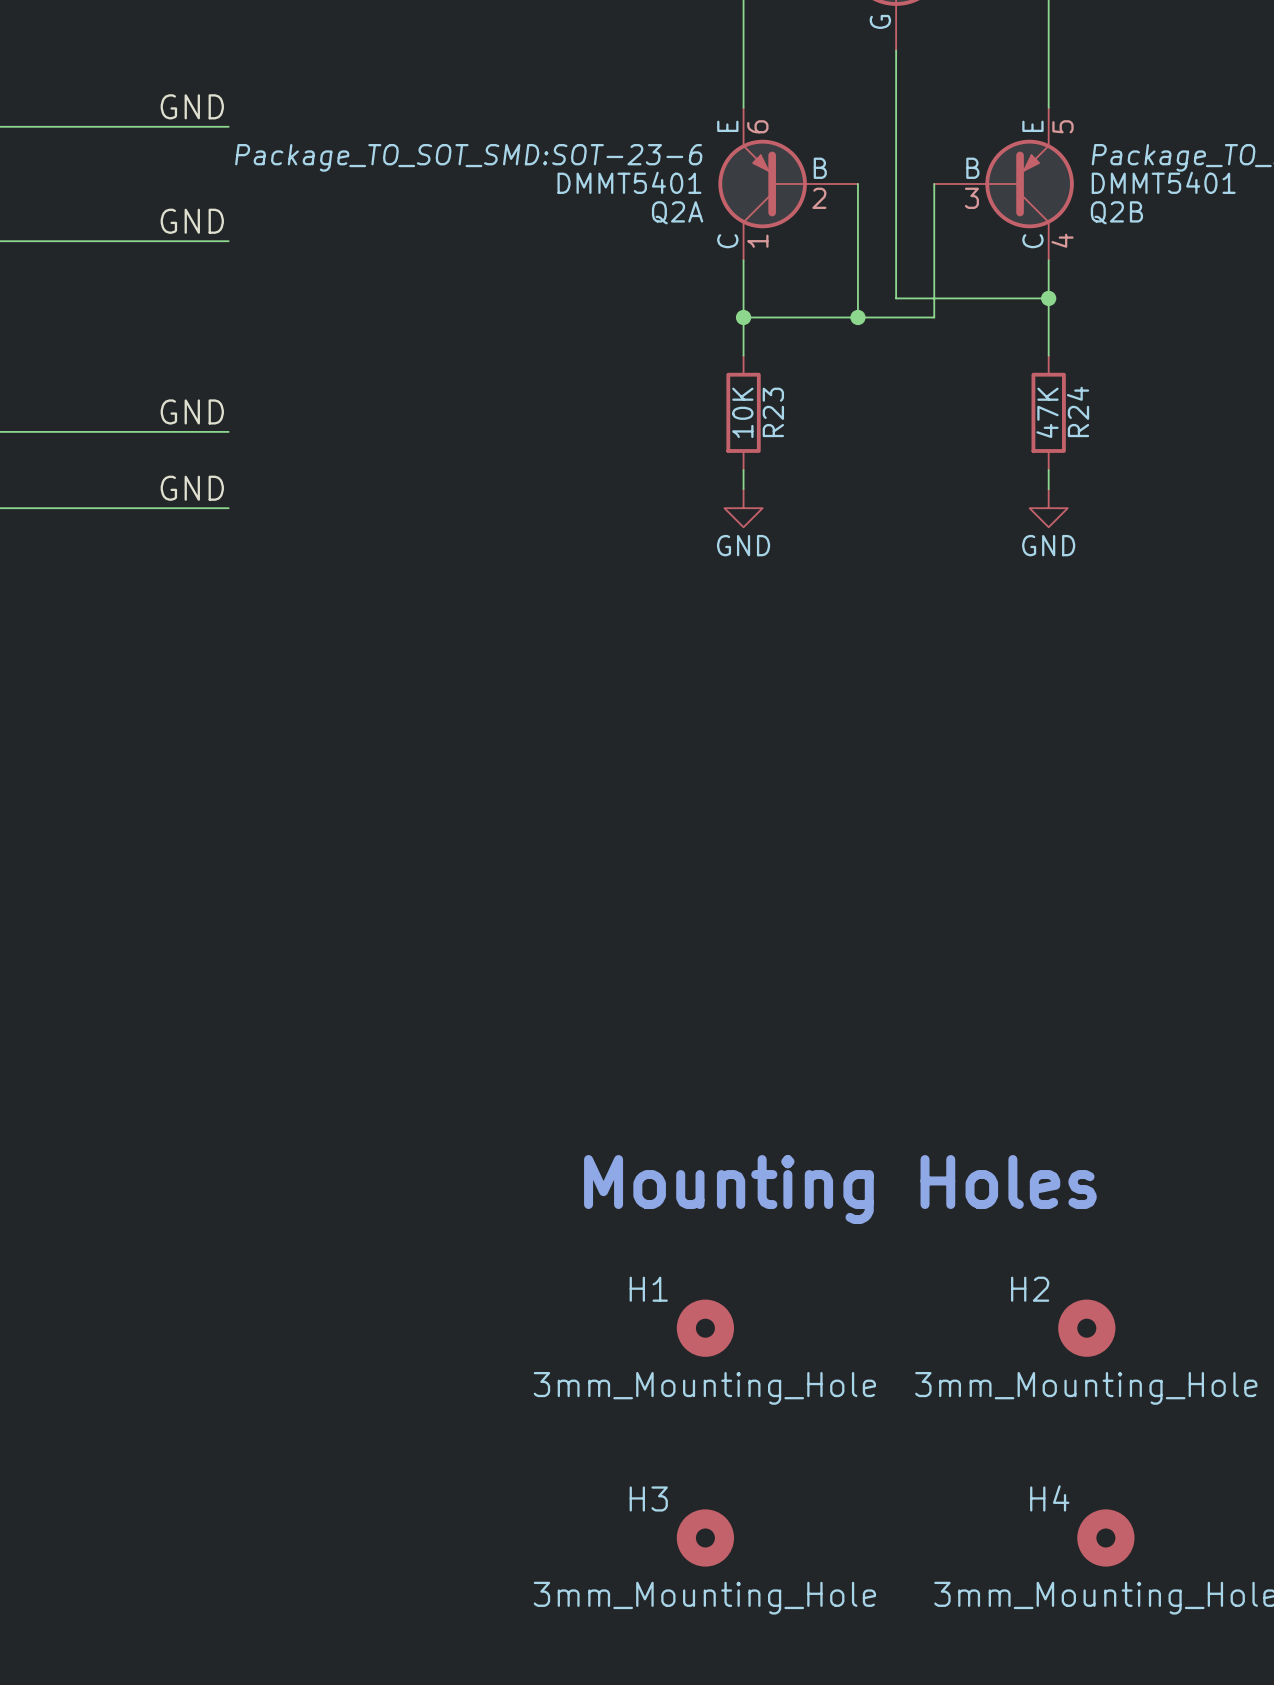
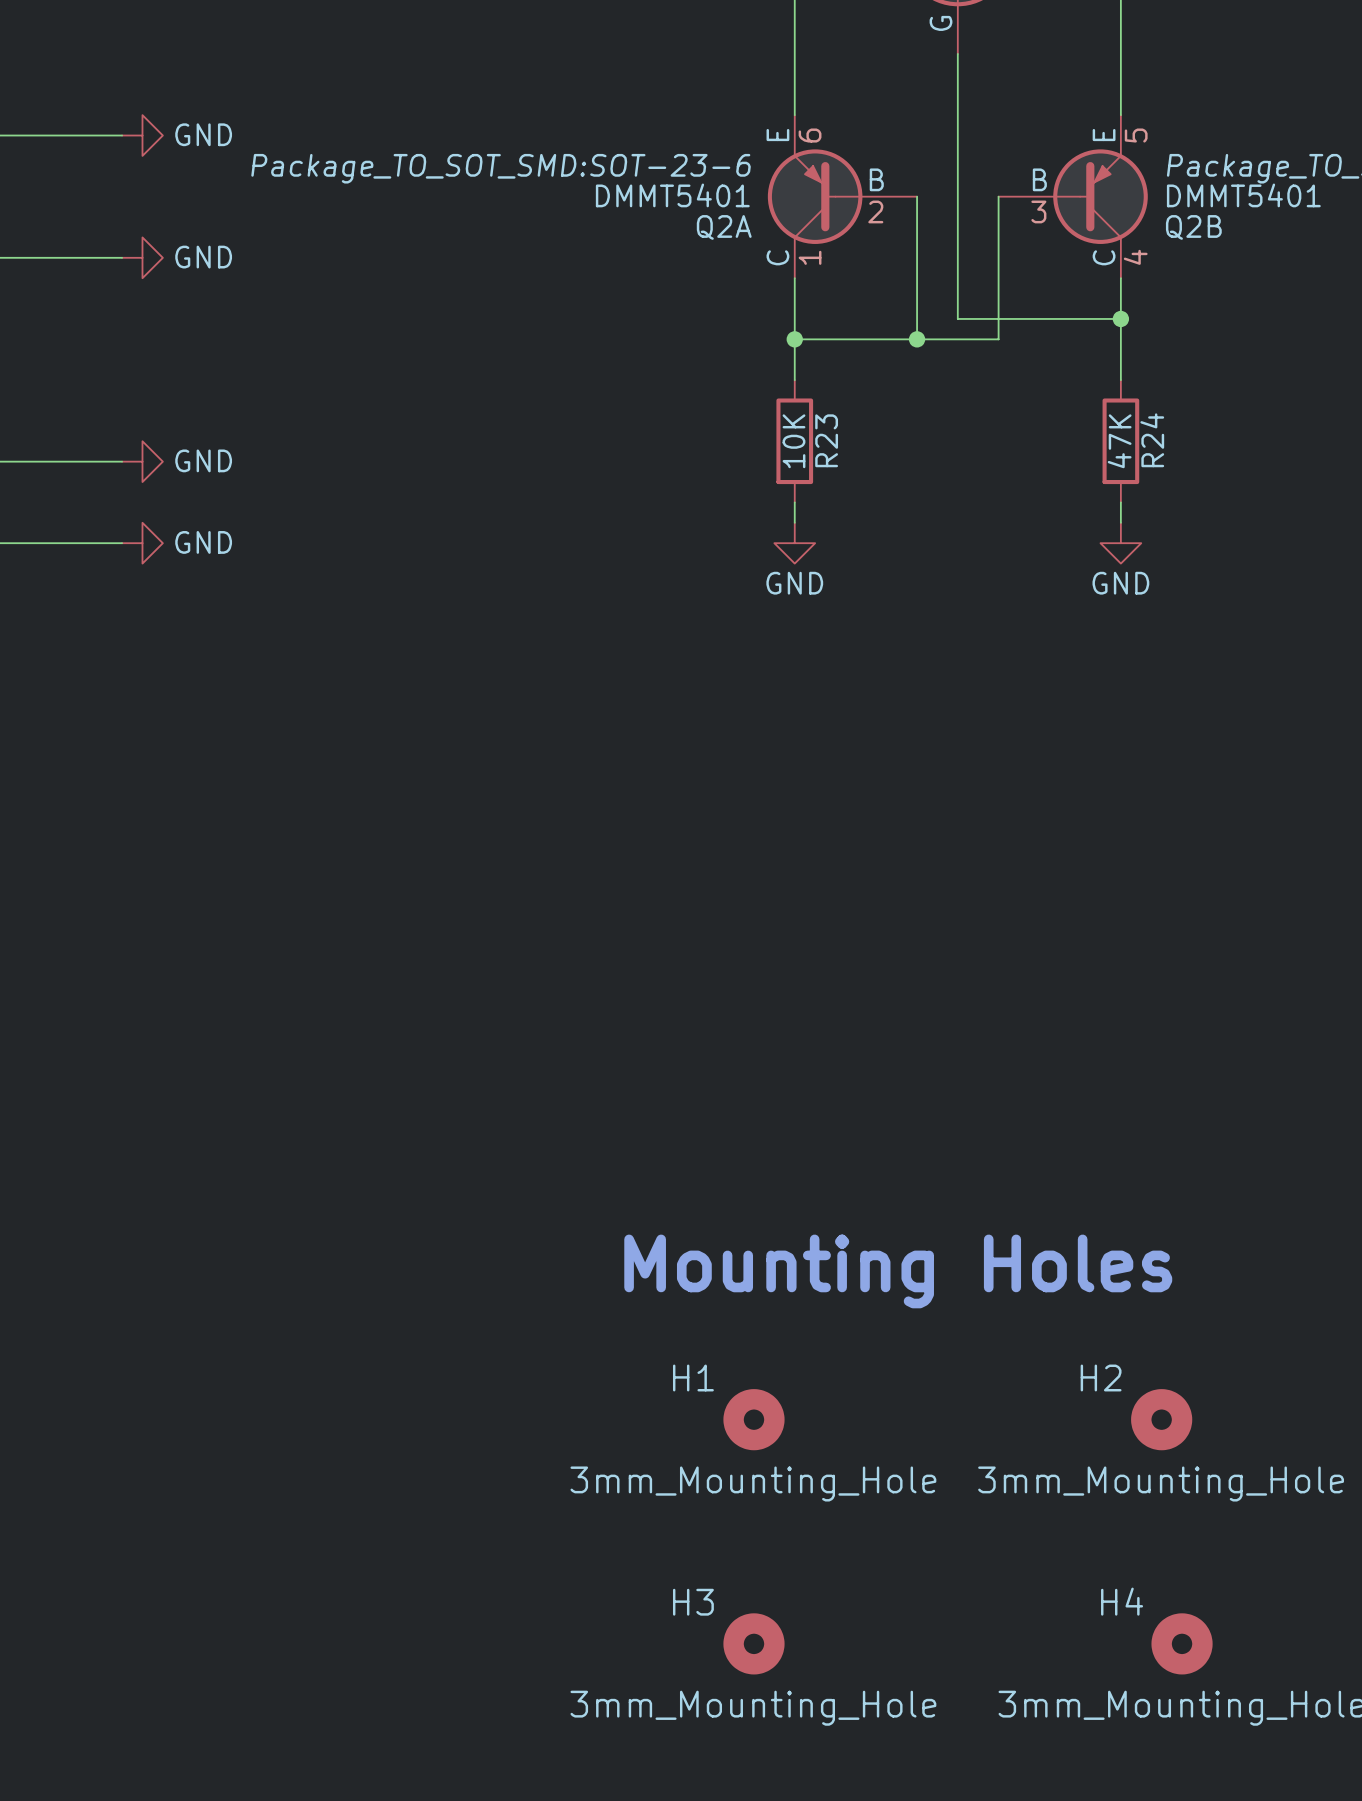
label: GND (192, 106) -> none
wire: (114, 126) (228, 126) -> none
power symbol: none -> GND (142, 135)
label: GND (192, 221) -> none
wire: (114, 241) (228, 241) -> none
power symbol: none -> GND (142, 257)
label: GND (192, 411) -> none
wire: (114, 431) (228, 431) -> none
power symbol: none -> GND (142, 461)
label: GND (192, 488) -> none
wire: (114, 508) (228, 508) -> none
power symbol: none -> GND (142, 543)

